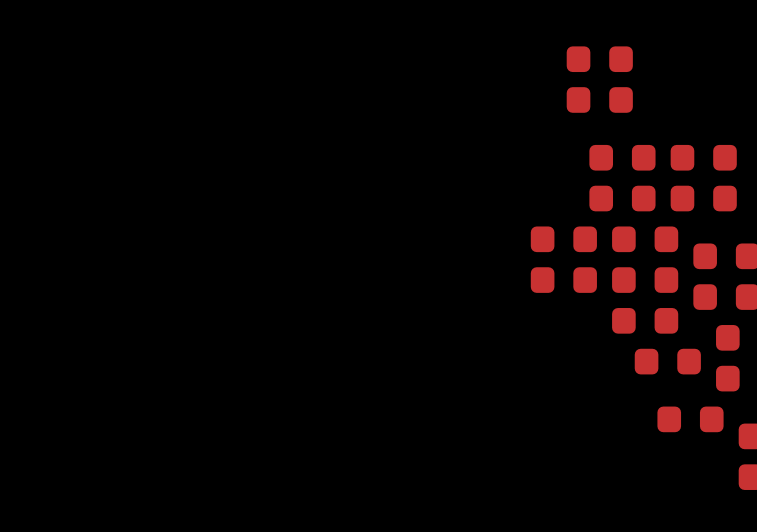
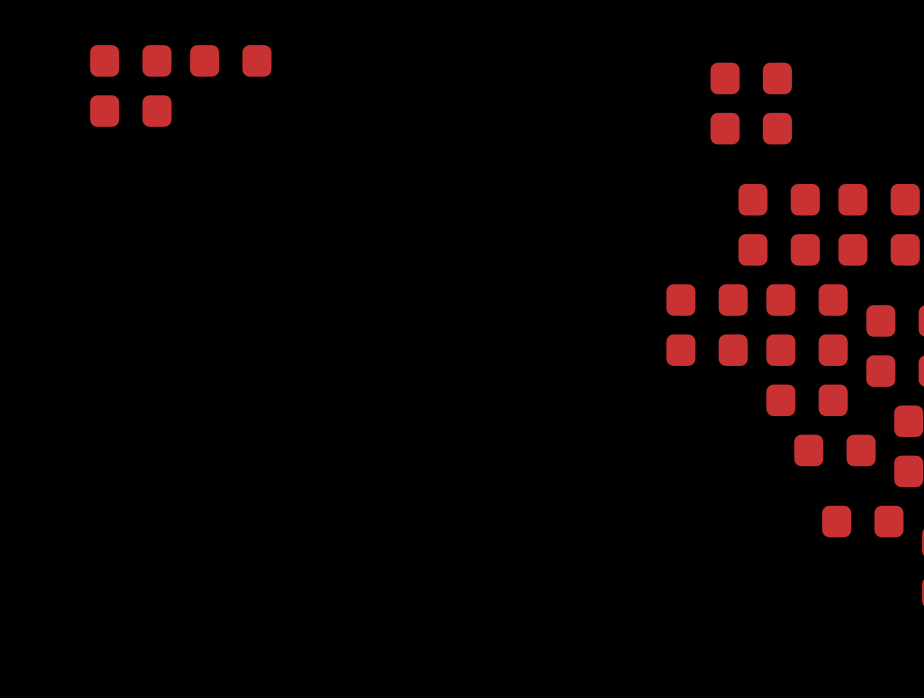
part: none -> (130, 60)
part: none -> (230, 60)
part: none -> (130, 111)

